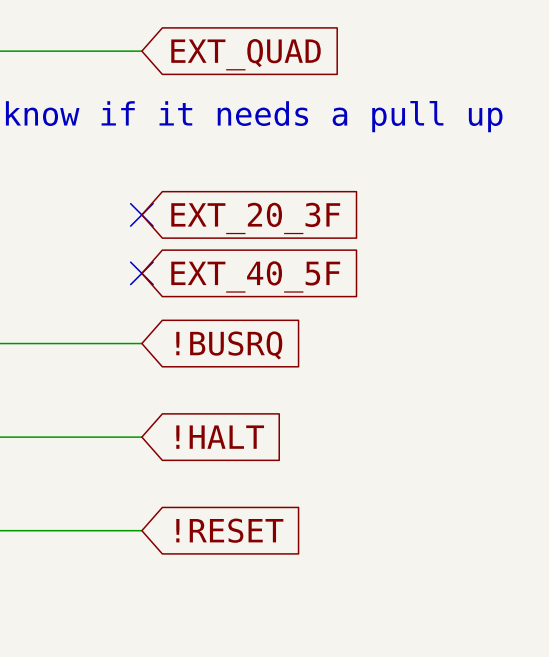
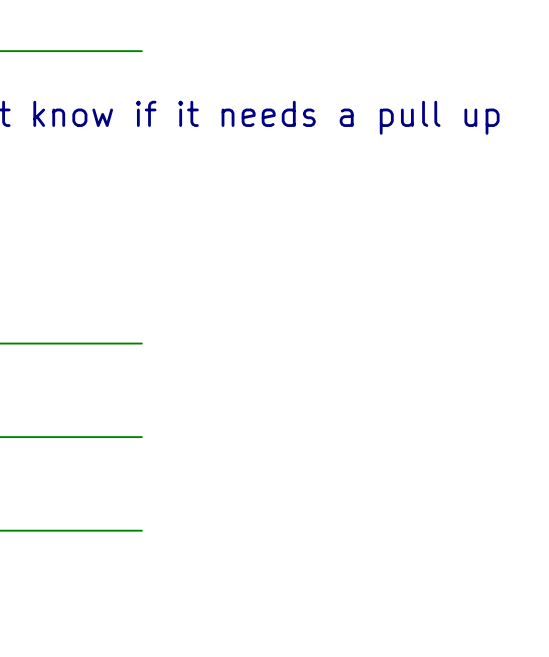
global label: EXT_QUAD (246, 54) -> none
no-connect mark: (141, 214) -> none
global label: EXT_20_3F (255, 218) -> none
no-connect mark: (141, 273) -> none
global label: EXT_40_5F (255, 276) -> none
global label: !BUSRQ (229, 345) -> none
global label: !HALT (220, 437) -> none
global label: !RESET (229, 530) -> none

